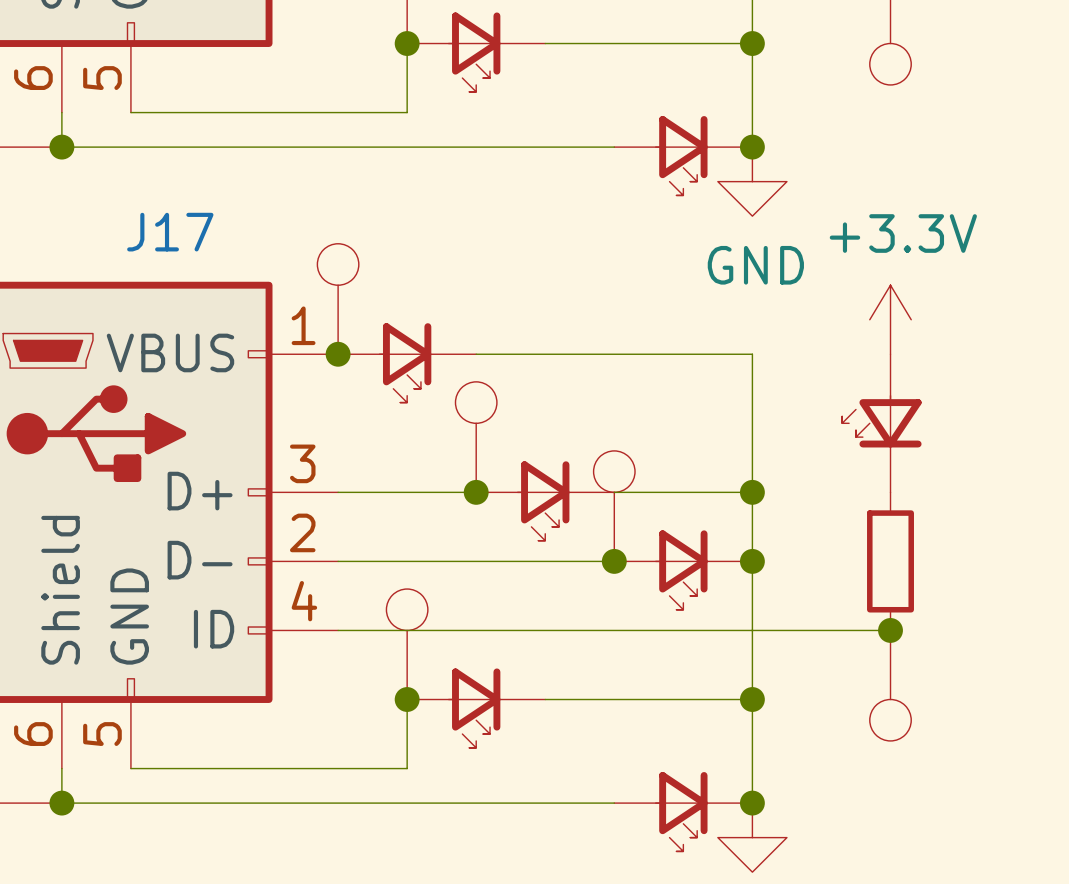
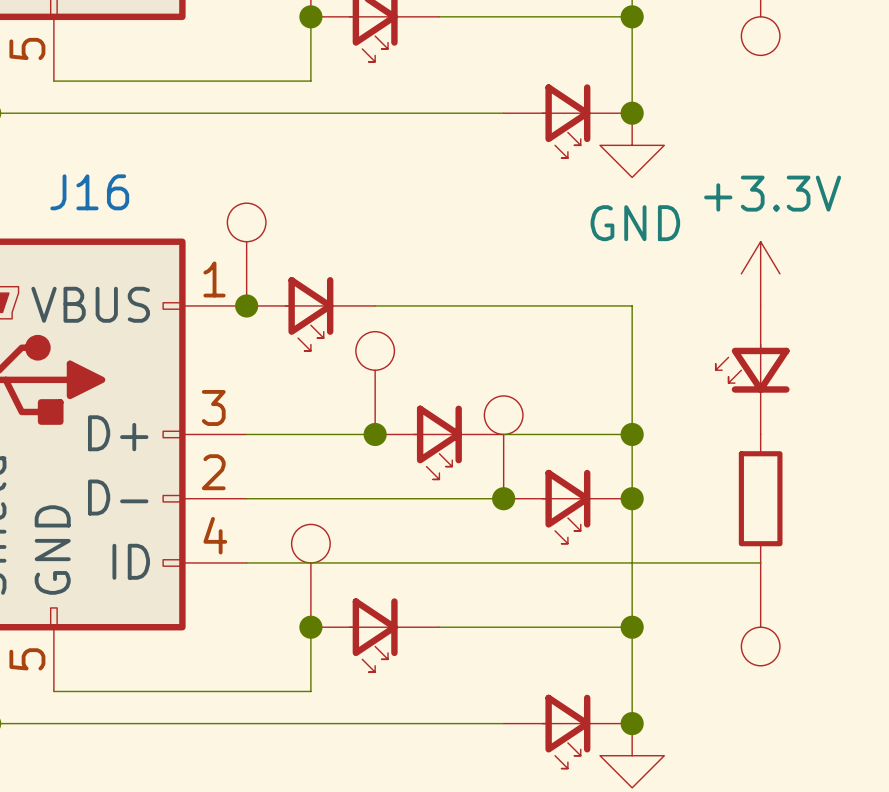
J17 name: J17 (170, 232) -> J16 (89, 192)
junction: (890, 630) -> none

